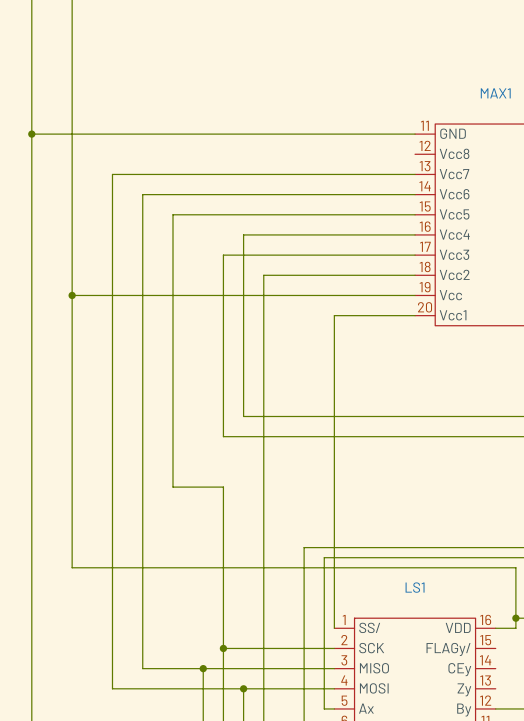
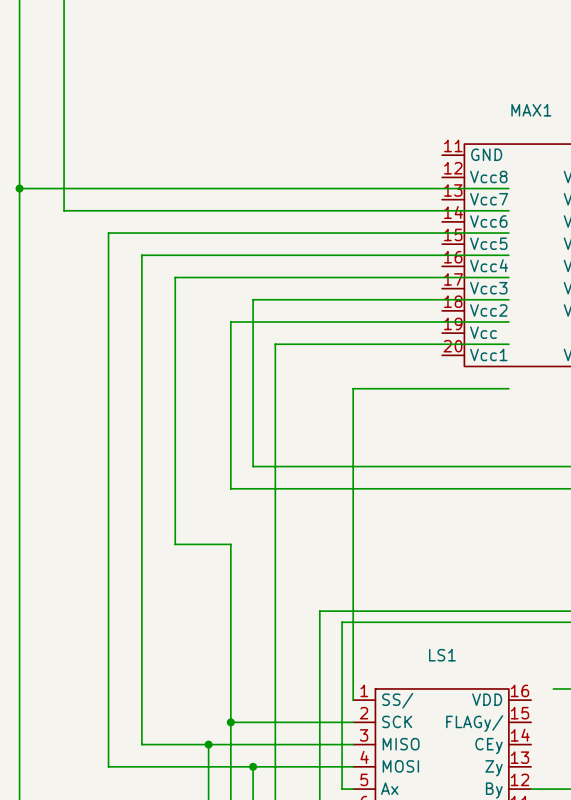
wire: (31, 134) (415, 134) -> none
junction position: (31, 134) -> (19, 188)
wire: none -> (19, 188) (508, 188)
wire: (415, 174) (112, 174) (112, 204) -> (508, 233) (108, 233)
wire: (72, 184) (72, 567) (515, 567) (515, 628) (495, 628) -> (64, 210) (508, 210)
wire: (415, 194) (142, 194) (142, 224) -> (508, 255) (141, 255)
wire: (415, 214) (173, 214) (173, 245) -> (508, 277) (175, 277)
wire: (415, 234) (243, 234) (243, 265) -> (508, 299) (253, 299)
wire: (415, 255) (223, 255) (223, 285) -> (508, 321) (230, 321)
wire: (415, 275) (263, 275) (263, 305) -> (508, 344) (275, 344)
wire: (72, 295) (415, 295) -> none
junction: (72, 295) -> none
wire: (415, 315) (334, 315) (334, 345) -> (508, 388) (353, 388)
junction: (515, 618) -> none

